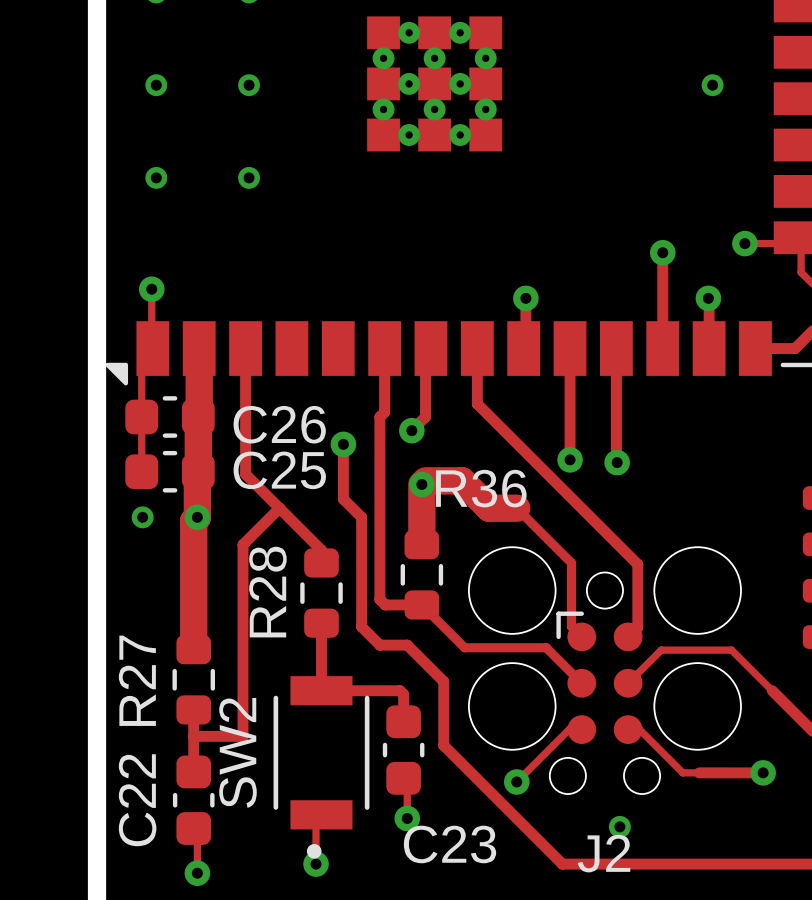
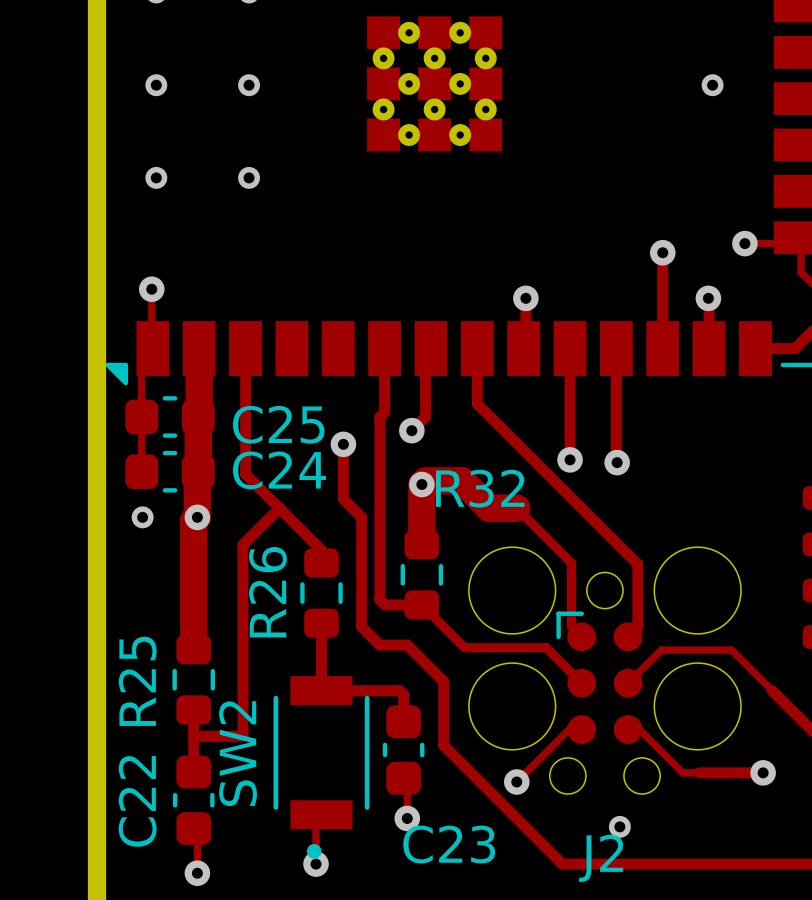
C26 name: C26 (279, 424) -> C25 (278, 424)
C25 name: C25 (279, 470) -> C24 (279, 470)
R36 name: R36 (481, 488) -> R32 (480, 488)
R28 name: R28 (267, 592) -> R26 (267, 592)
R27 name: R27 (137, 680) -> R25 (137, 681)

